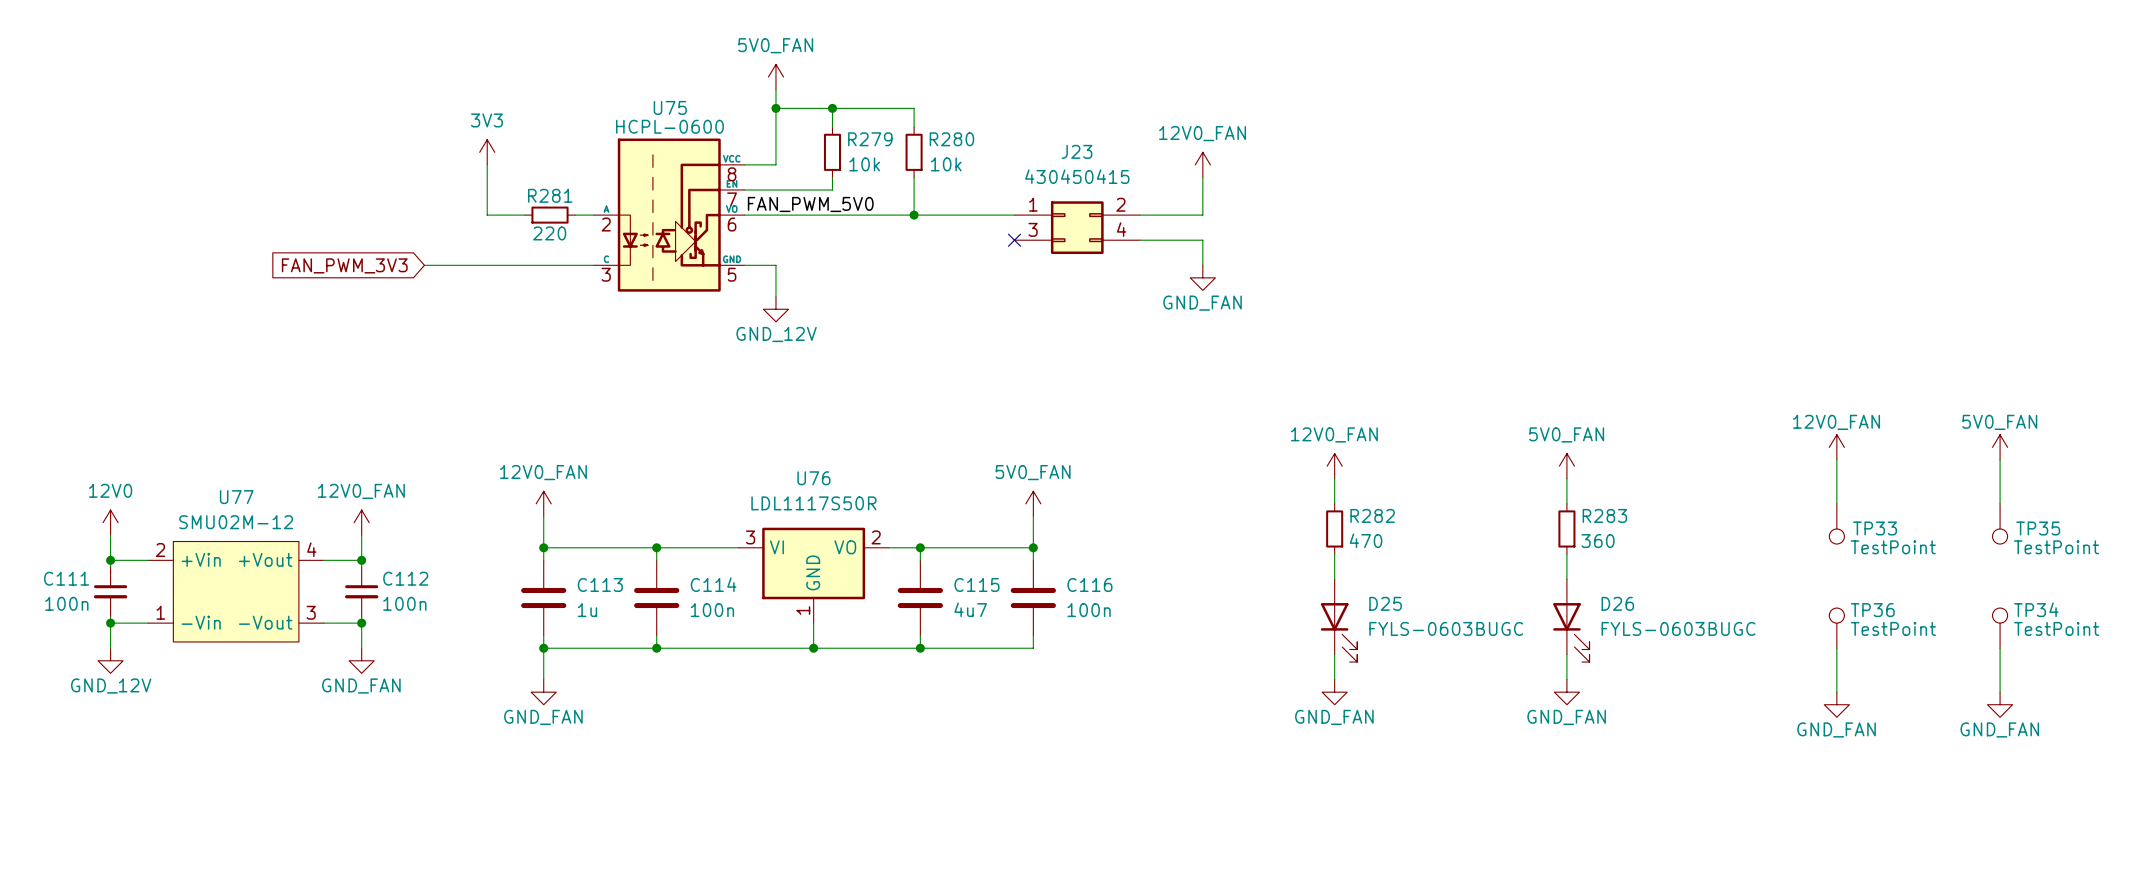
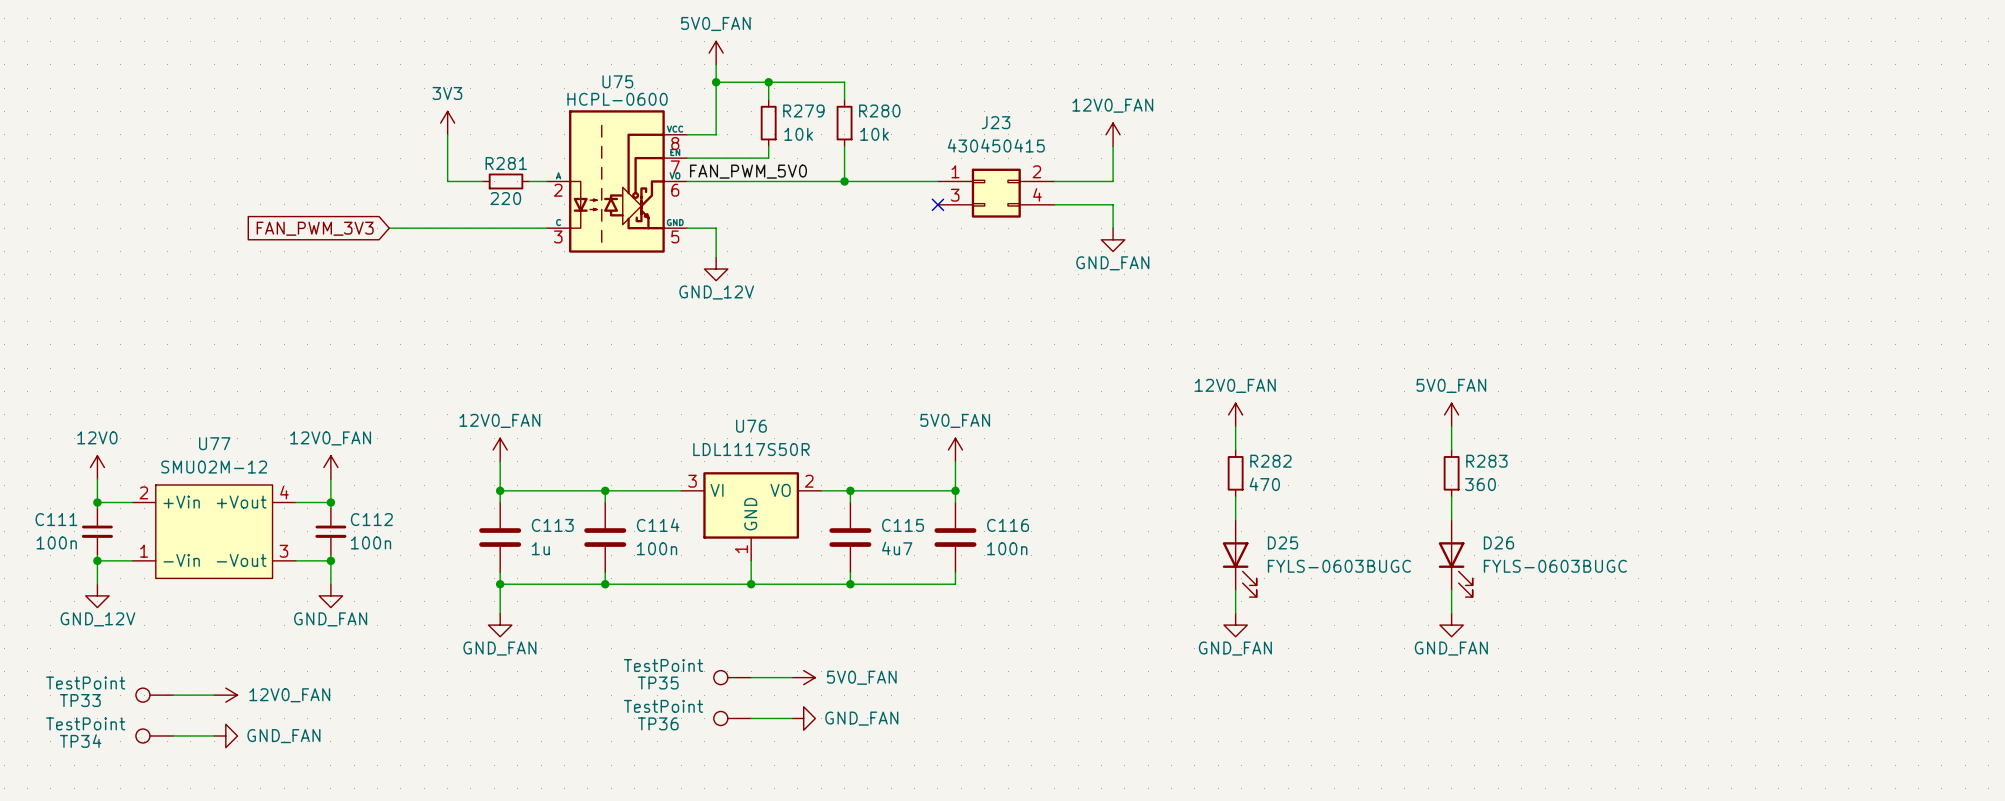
power symbol: 12V0_FAN (1836, 447) -> none
power symbol: 5V0_FAN (2000, 447) -> none
wire: (1836, 459) (1836, 503) -> none
wire: (2000, 459) (2000, 503) -> none
TP33 position: (1836, 523) -> (154, 695)
TP35 position: (2000, 523) -> (732, 677)
TP33 name position: TP33 (1875, 528) -> TP33 (80, 700)
TP35 name position: TP35 (2038, 528) -> TP35 (658, 683)
TP33 rotation: 0° (1836, 536) -> 90° clockwise (142, 695)
TP35 rotation: 0° (2000, 536) -> 90° clockwise (720, 677)
TP33 value position: TestPoint (1893, 547) -> TestPoint (85, 683)
TP35 value position: TestPoint (2056, 547) -> TestPoint (663, 665)
TP34 name position: TP34 (2036, 609) -> TP34 (80, 741)
TP36 name position: TP36 (1872, 610) -> TP36 (658, 723)
TP36 rotation: 0° (1836, 615) -> 90° counterclockwise (720, 718)
TP34 rotation: 0° (2000, 615) -> 90° counterclockwise (142, 735)
TP36 position: (1836, 628) -> (732, 718)
TP36 value position: TestPoint (1893, 628) -> TestPoint (663, 706)
TP34 position: (2000, 628) -> (154, 735)
TP34 value position: TestPoint (2056, 628) -> TestPoint (85, 723)
wire: (1836, 648) (1836, 692) -> none
wire: (2000, 648) (2000, 692) -> none
power symbol: GND_FAN (1836, 704) -> none
power symbol: GND_FAN (2000, 704) -> none
wire: none -> (751, 677) (792, 677)
power symbol: none -> 5V0_FAN (803, 677)
wire: none -> (173, 695) (214, 695)
power symbol: none -> 12V0_FAN (225, 695)
wire: none -> (751, 718) (792, 718)
power symbol: none -> GND_FAN (803, 718)
wire: none -> (173, 735) (214, 735)
power symbol: none -> GND_FAN (225, 735)

